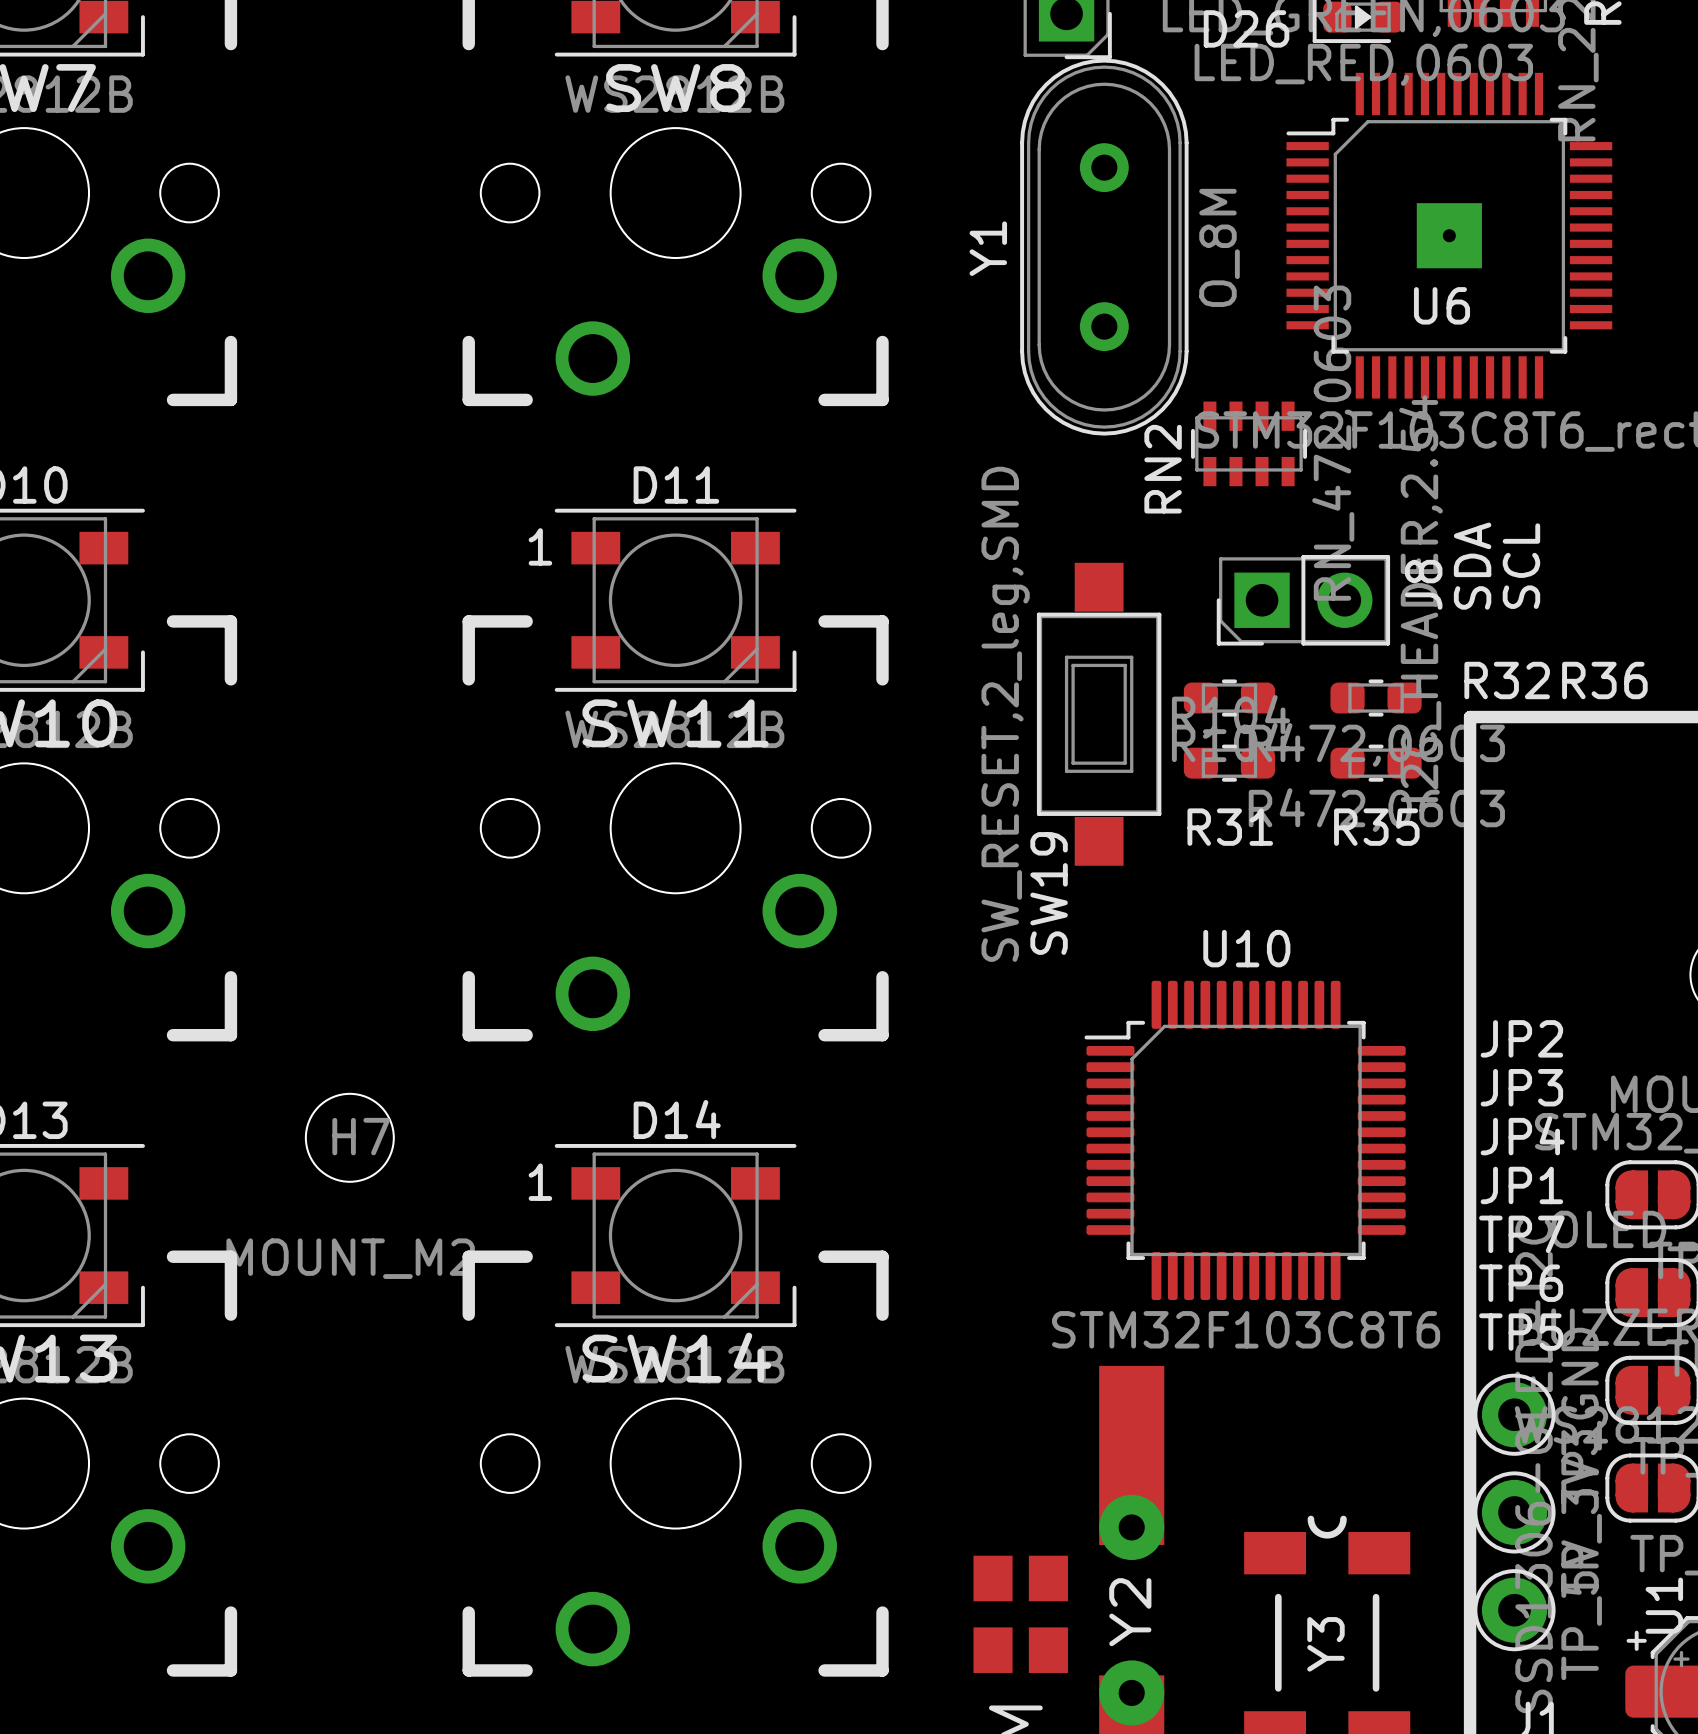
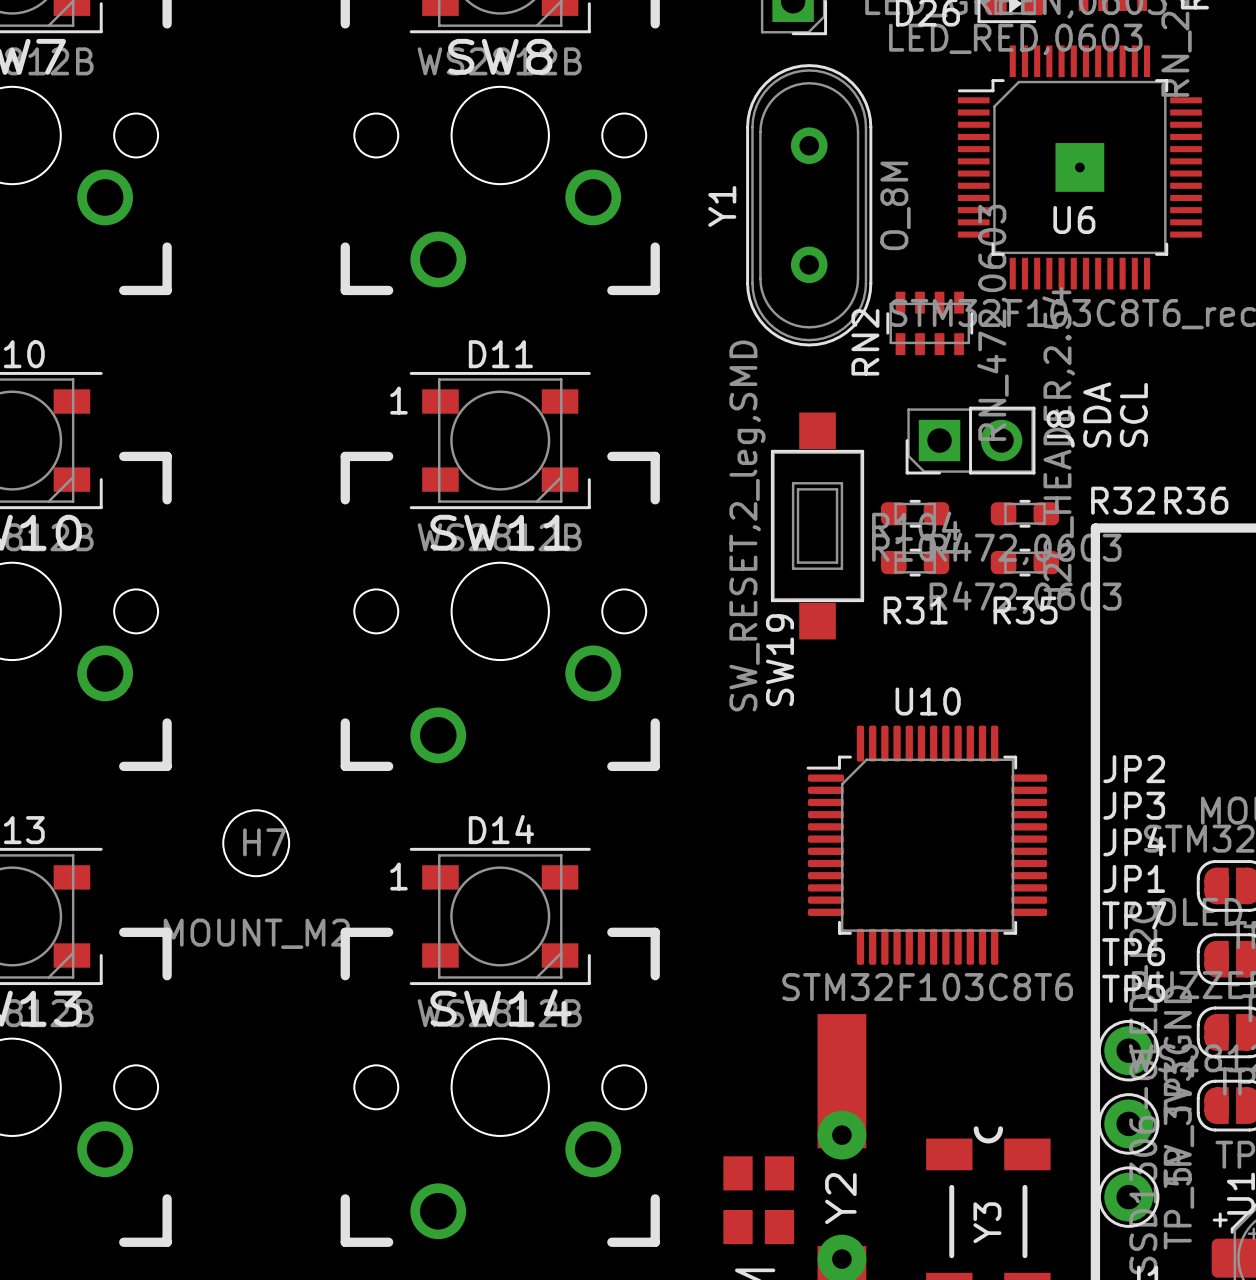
Y1 position: (1104, 247) -> (809, 205)

